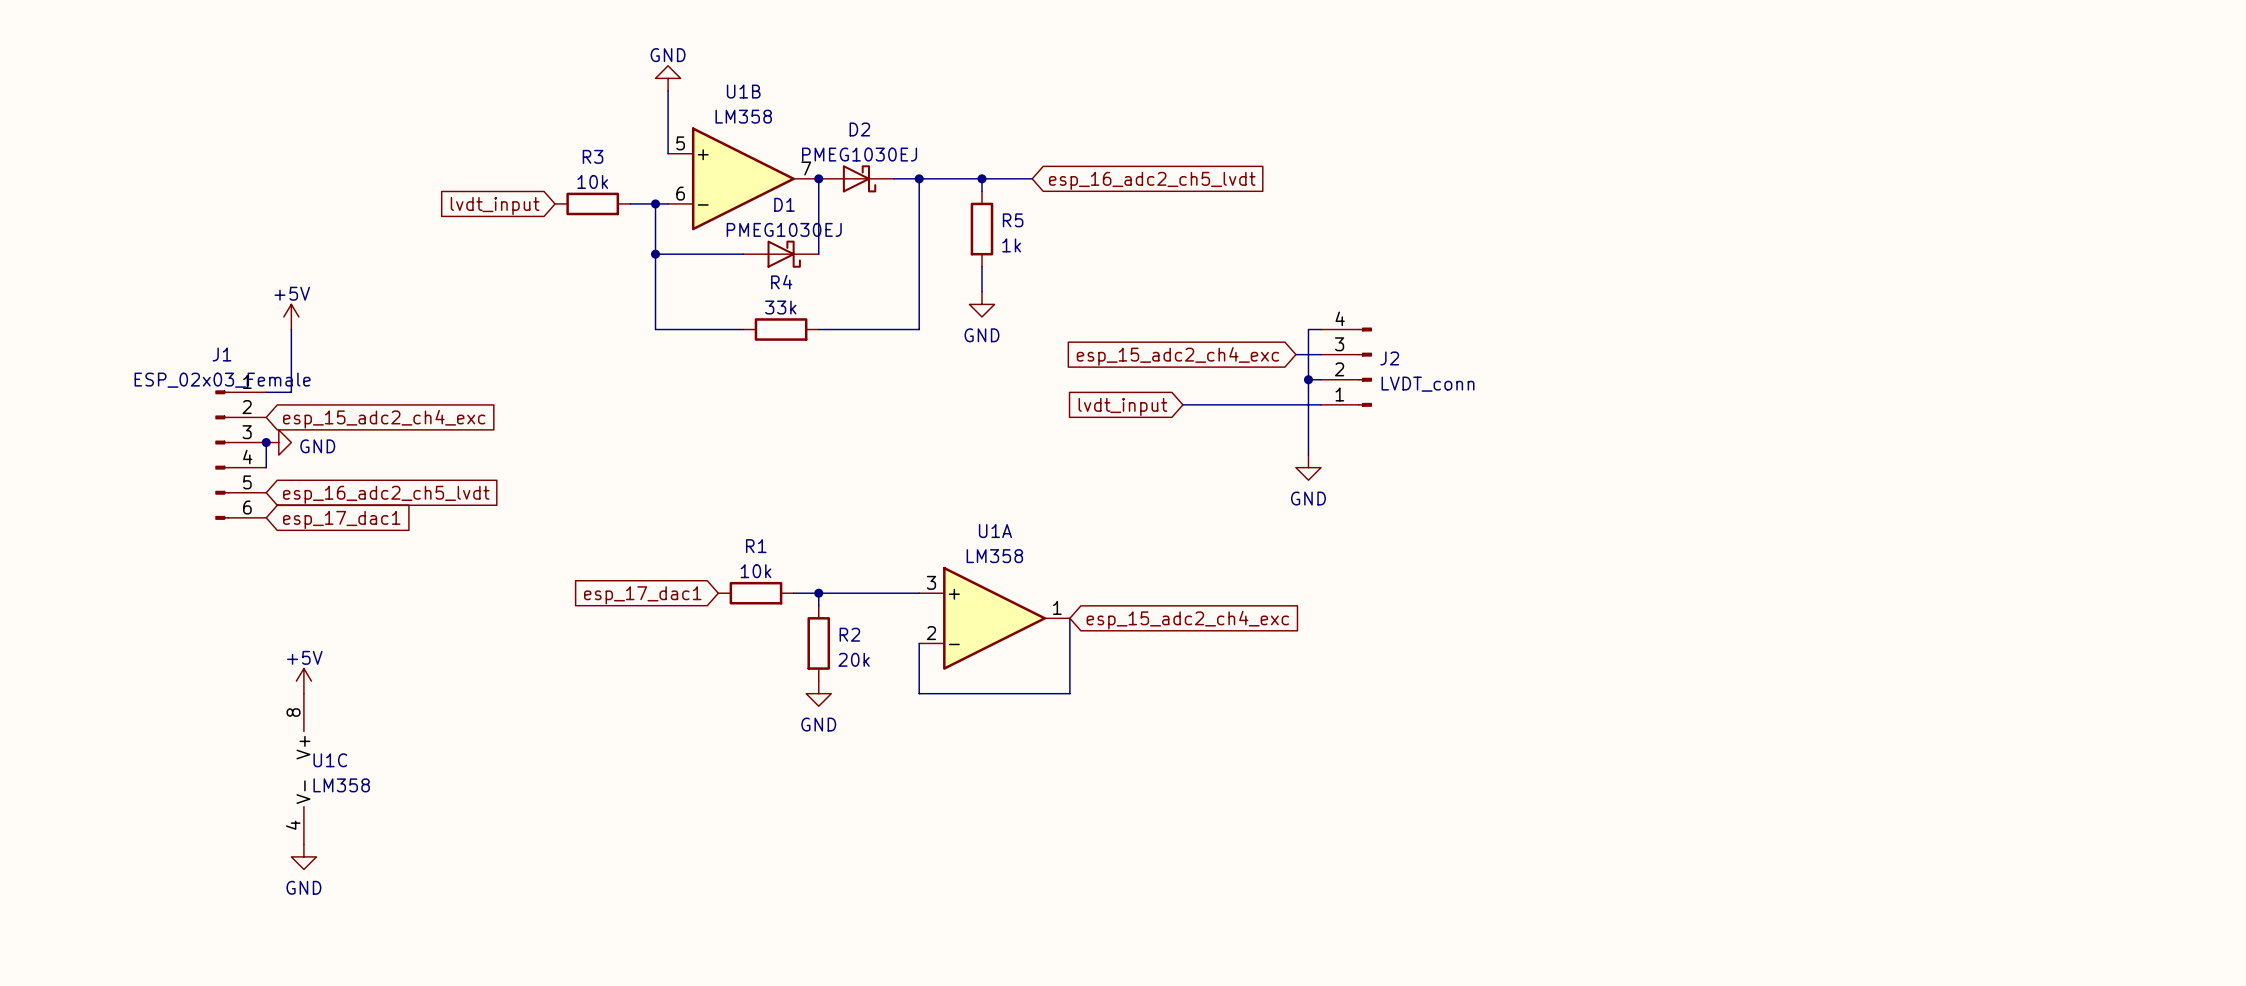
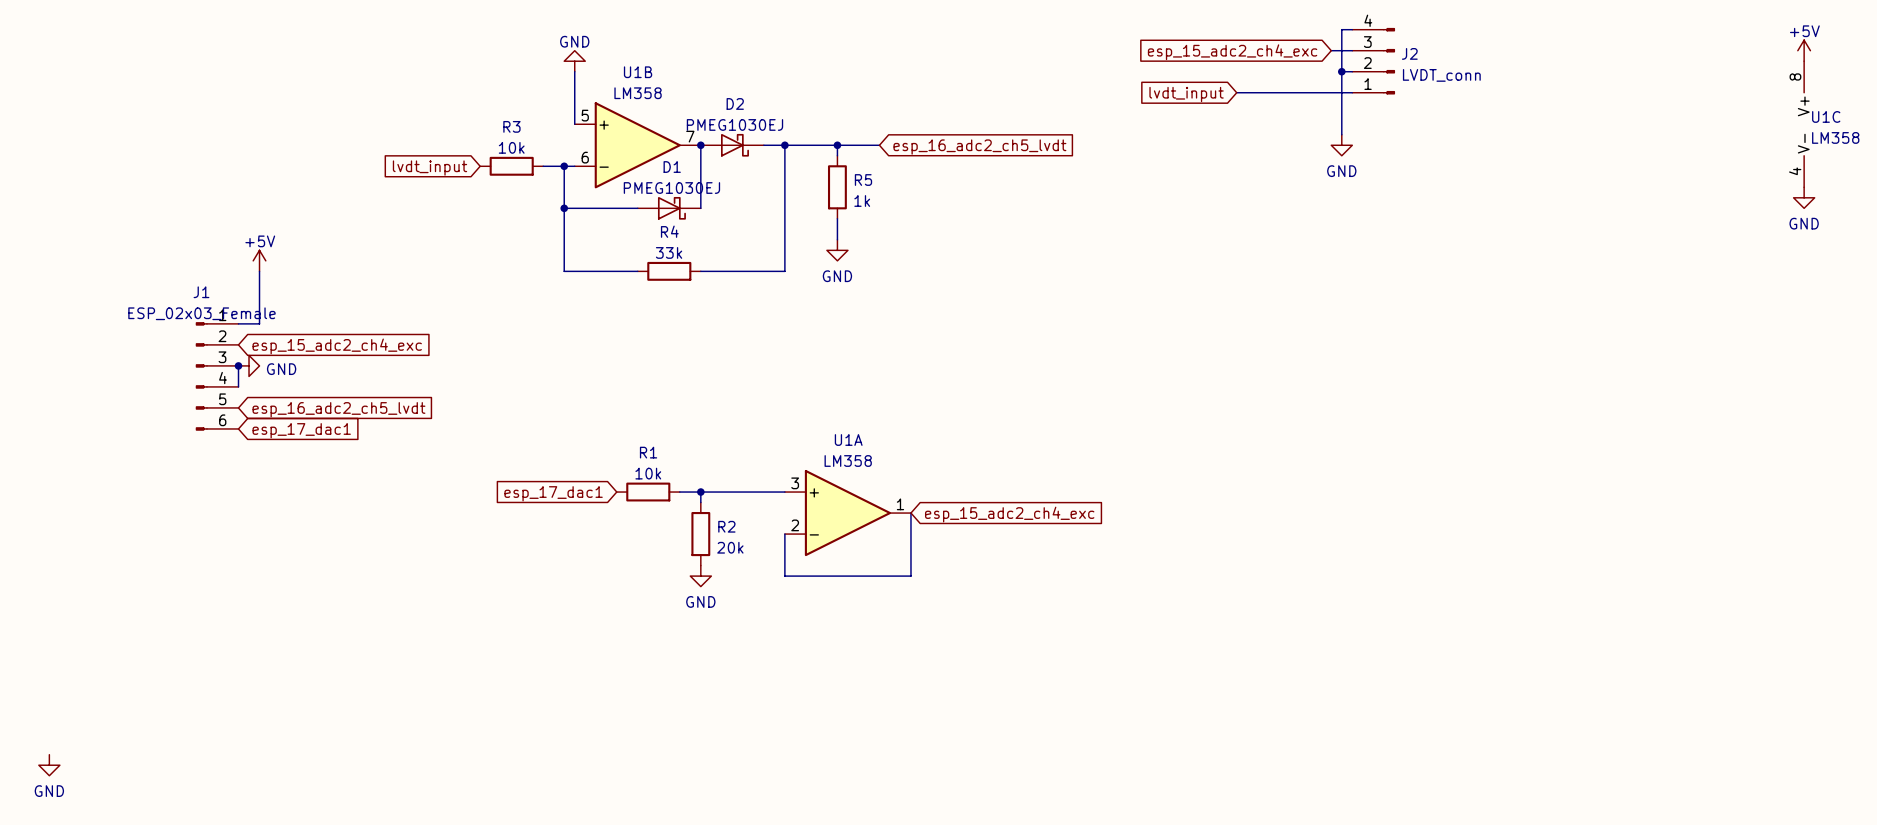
wire: none -> (1352, 29) (1341, 29) (1341, 134)
wire: none -> (1331, 50) (1352, 50)
power symbol: none -> +5V (1804, 50)
global label: none -> esp_15_adc2_ch4_exc (1232, 52)
wire: none -> (1341, 71) (1352, 71)
junction: none -> (1341, 71)
wire: none -> (1236, 92) (1352, 92)
global label: none -> lvdt_input (1186, 94)
power symbol: none -> GND (1341, 145)
power symbol: none -> GND (1804, 197)
wire: (1321, 329) (1308, 329) (1308, 455) -> none
wire: (1295, 354) (1321, 354) -> none
global label: esp_15_adc2_ch4_exc (1177, 356) -> none
J2 position: (1346, 367) -> (1373, 61)
wire: (1308, 379) (1321, 379) -> none
junction: (1308, 379) -> none
wire: (1182, 404) (1321, 404) -> none
global label: lvdt_input (1122, 406) -> none
power symbol: GND (1308, 467) -> none
power symbol: +5V (303, 681) -> none
U1C position: (303, 769) -> (1804, 124)
power symbol: GND (303, 856) -> none
power symbol: none -> GND (49, 765)

